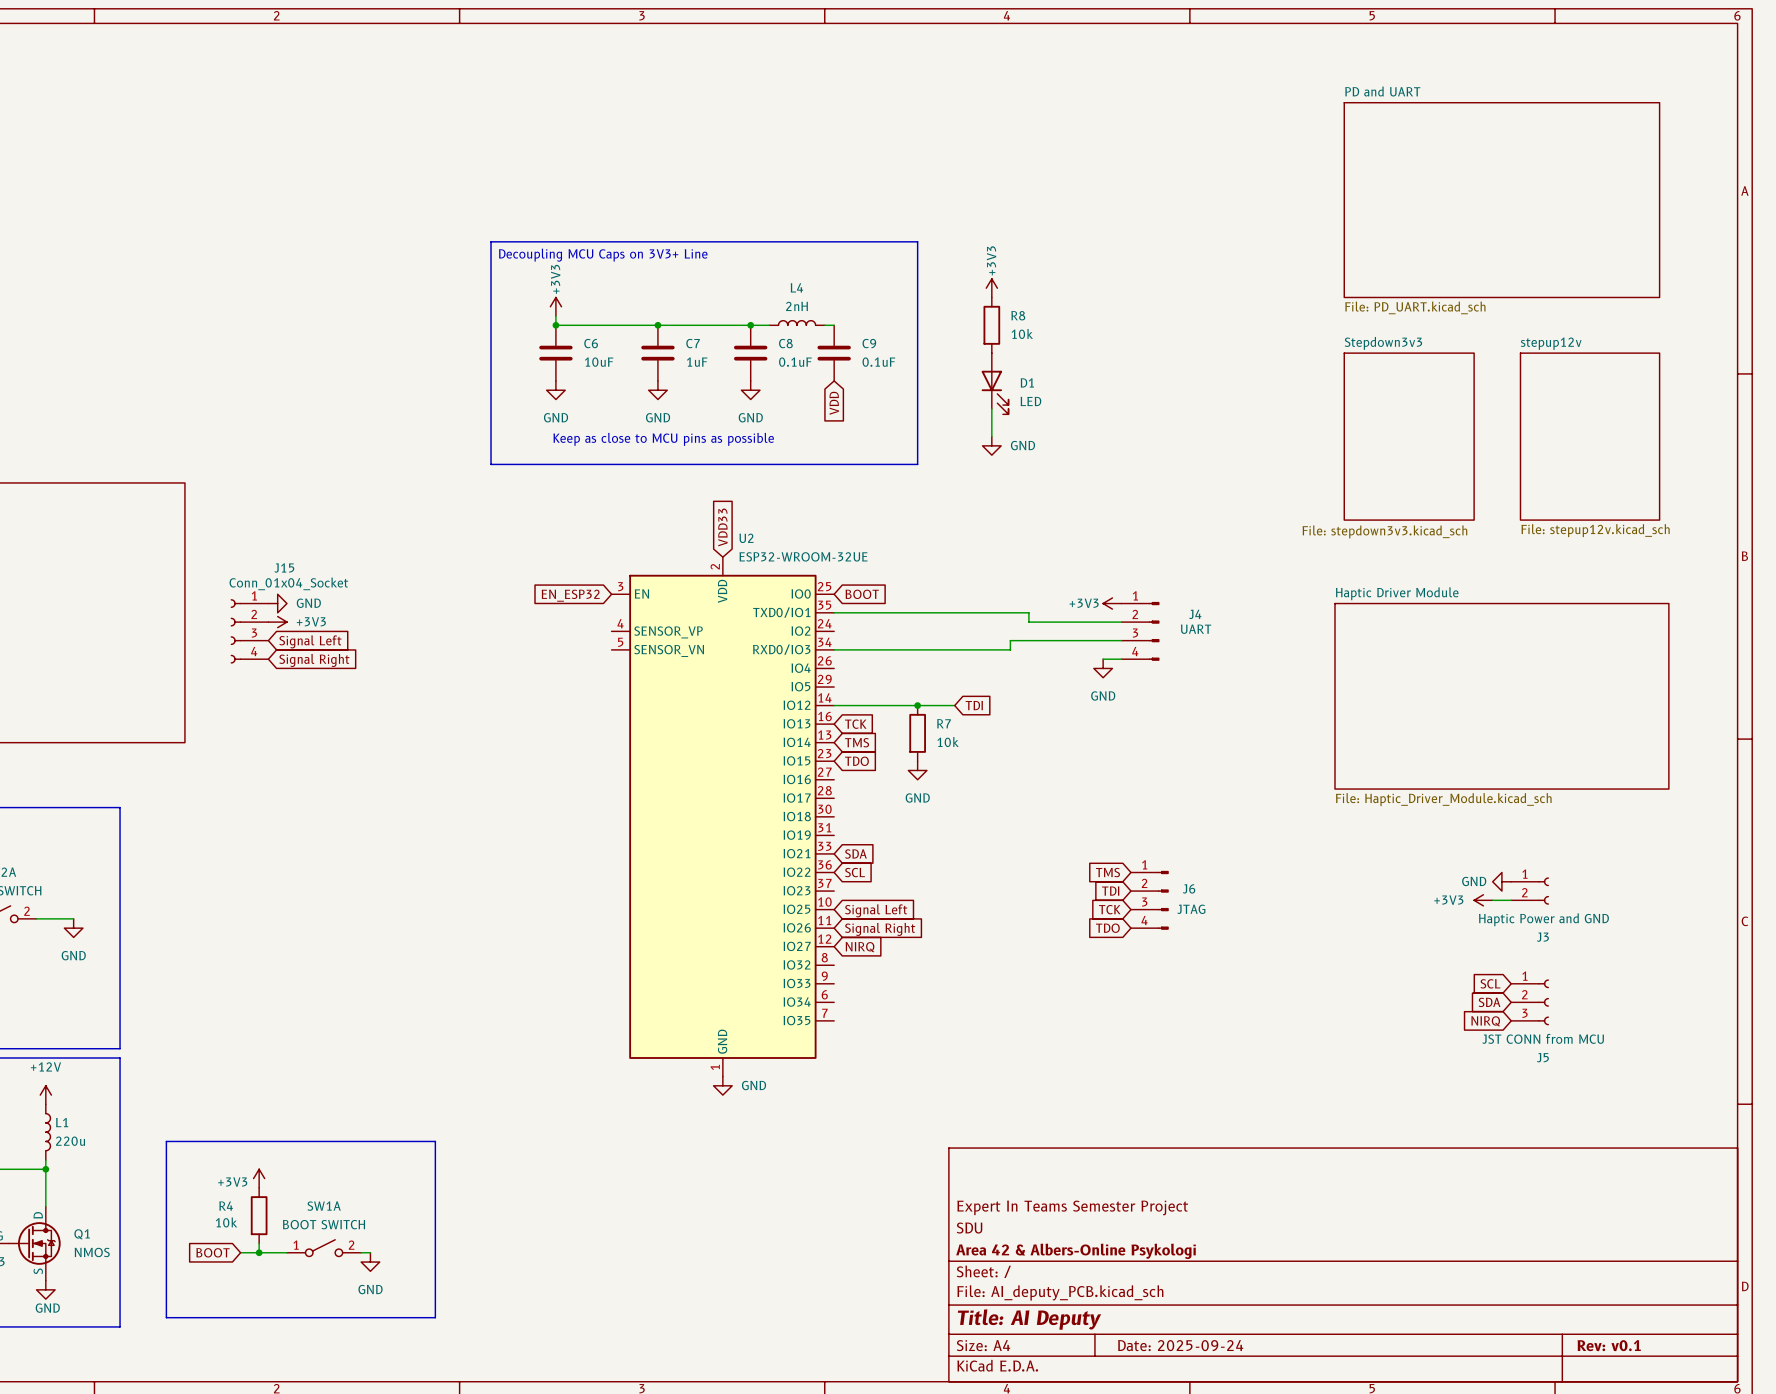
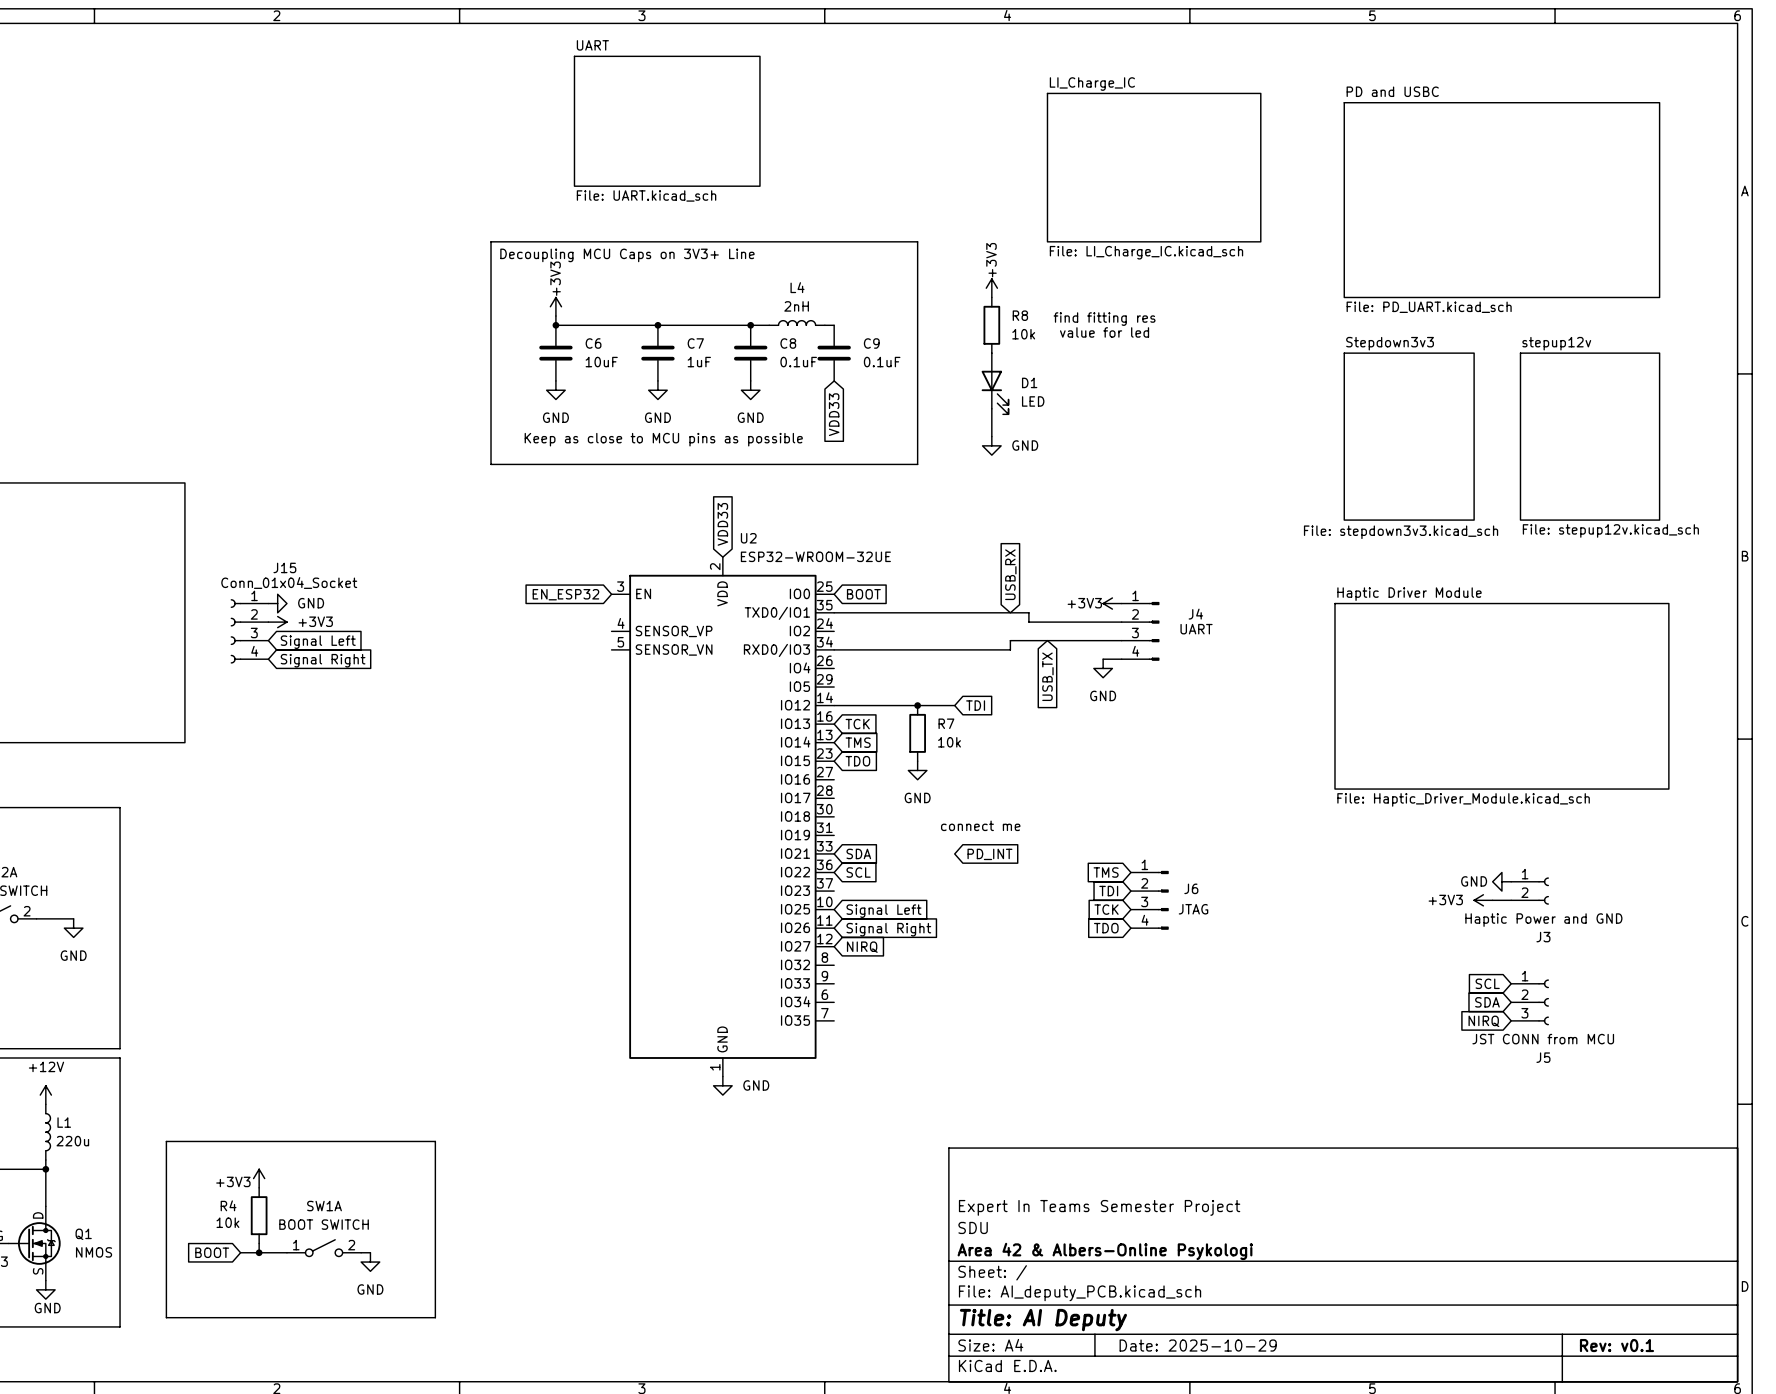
sheet PD and UART name: PD and UART (1382, 91) -> PD and USBC (1392, 91)
sheet UART: none -> File: UART.kicad_sch (667, 121)
sheet LI_Charge_IC: none -> File: LI_Charge_IC.kicad_sch (1154, 167)
text: none -> find fitting res (1104, 319)
text: none -> value for led (1104, 332)
global label: VDD (834, 403) -> VDD33 (834, 414)
global label: none -> USB_RX (1010, 574)
global label: none -> USB_TX (1047, 676)
text: none -> connect me (980, 825)
global label: none -> PD_INT (989, 854)
title block: Date: 2025-09-24 (1180, 1345) -> Date: 2025-10-29 (1198, 1345)

